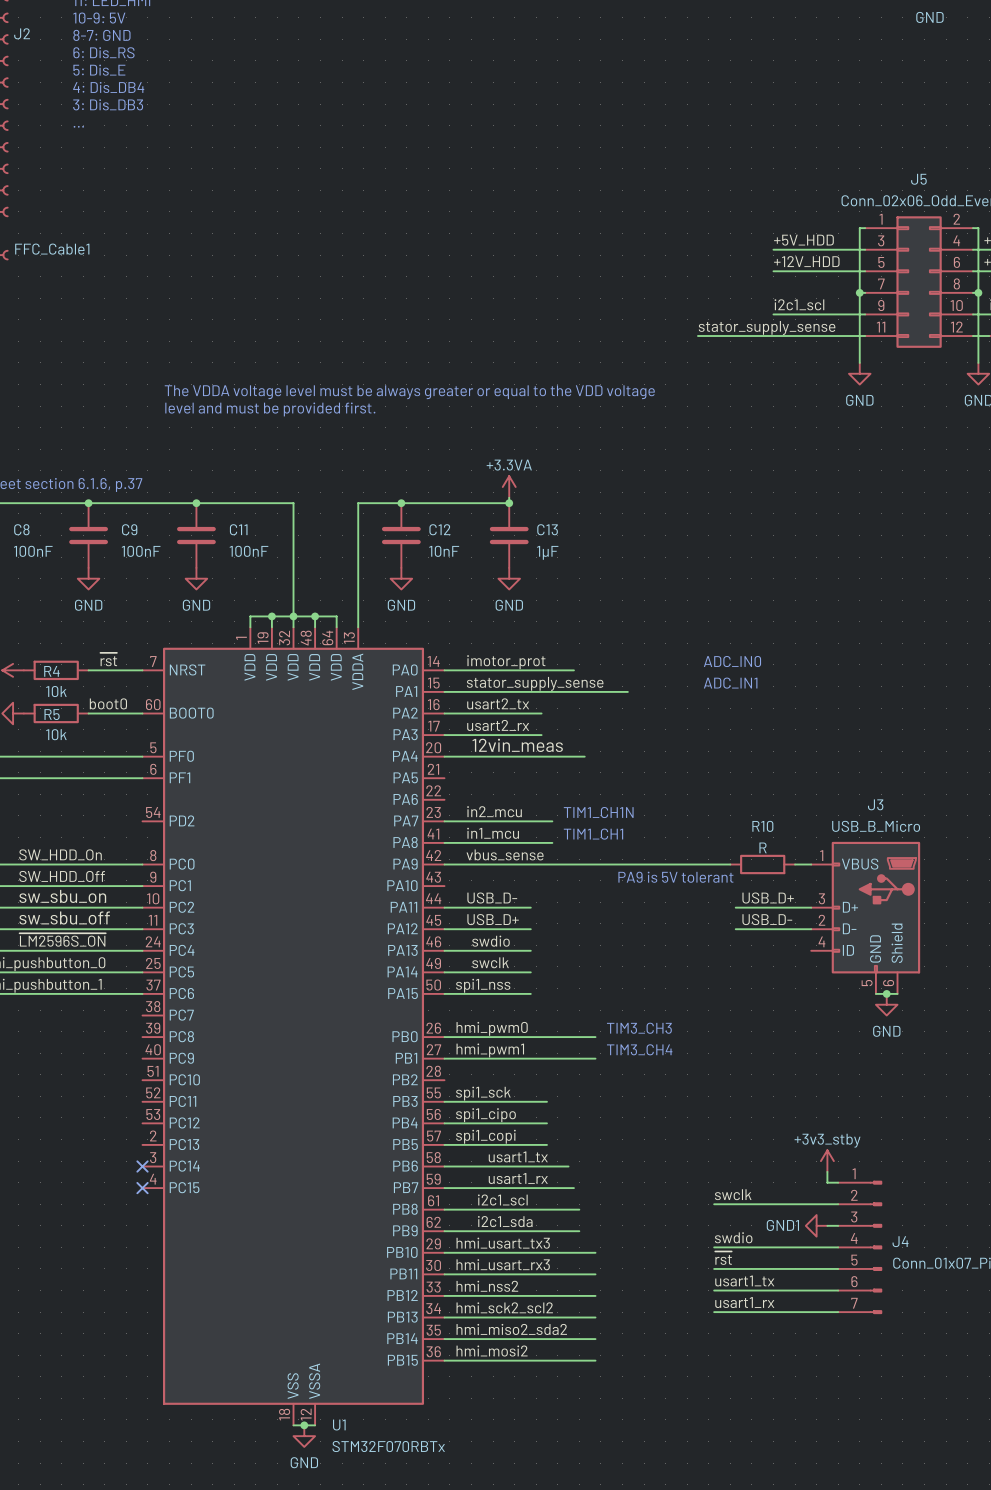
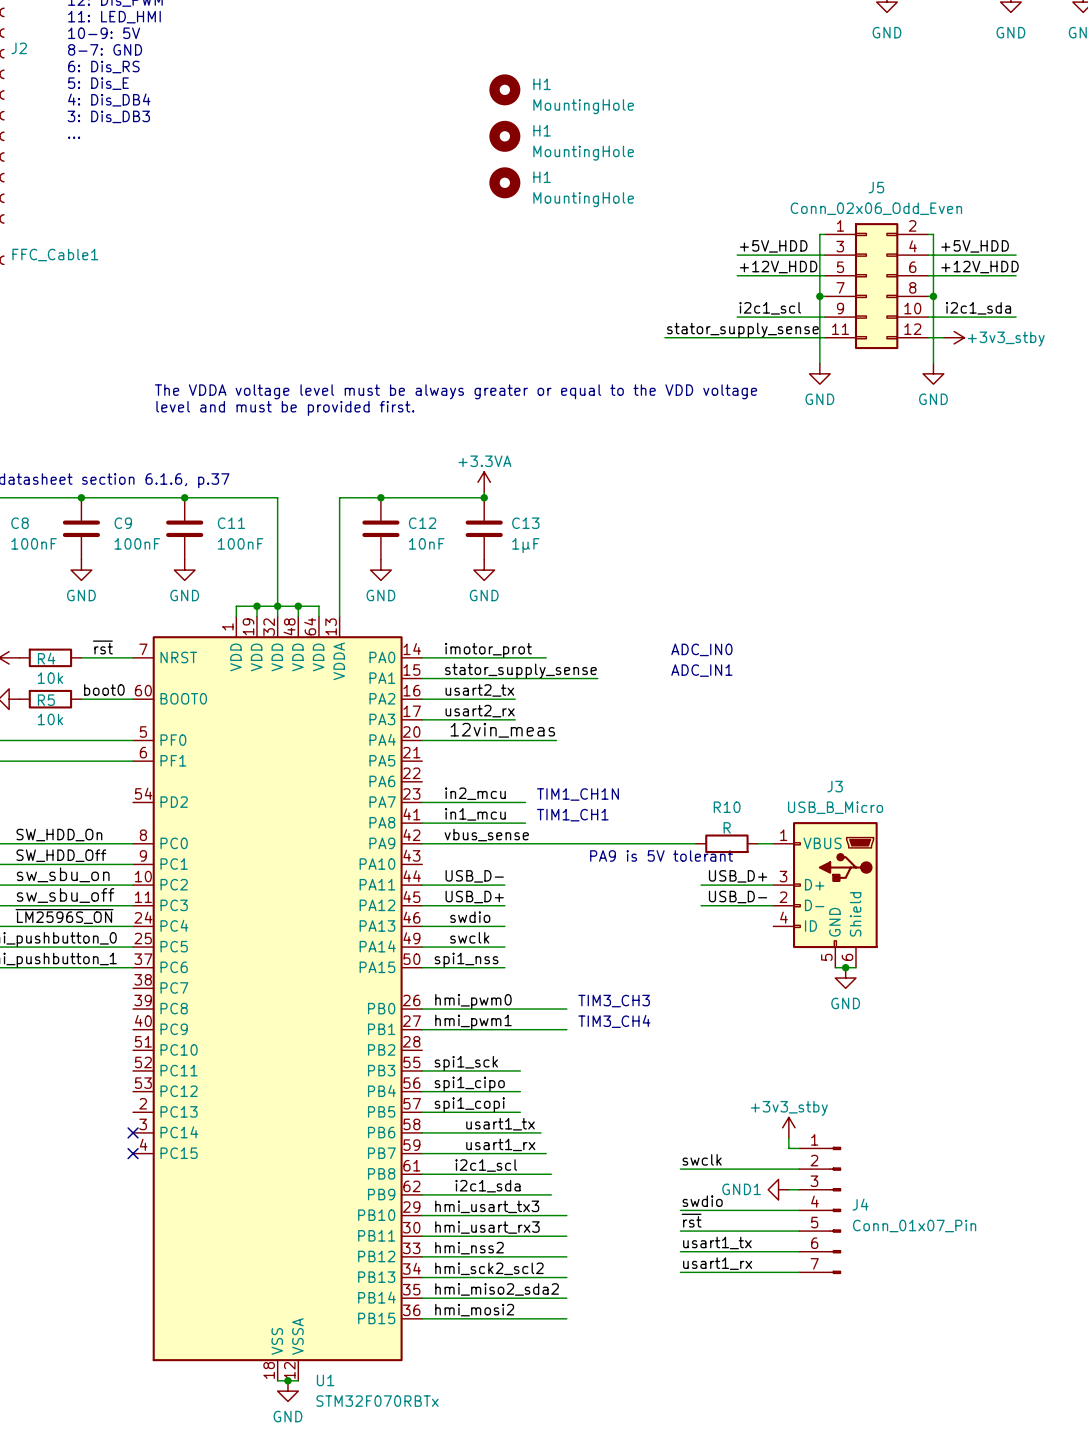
H1: none -> MountingHole (504, 89)
H1: none -> MountingHole (504, 136)
H1: none -> MountingHole (504, 182)

